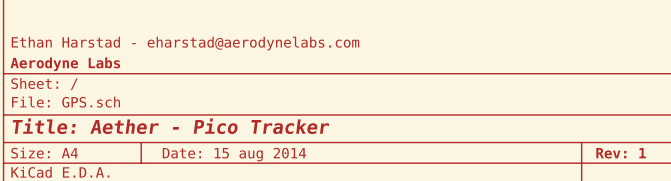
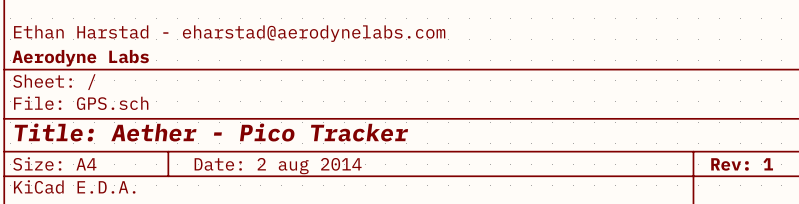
title block: Date: 15 aug 2014 (234, 154) -> Date: 2 aug 2014 (278, 166)

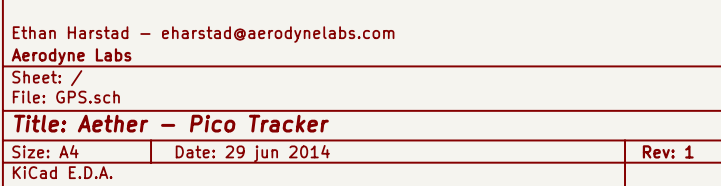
title block: Date: 2 aug 2014 (278, 166) -> Date: 29 jun 2014 (252, 153)

